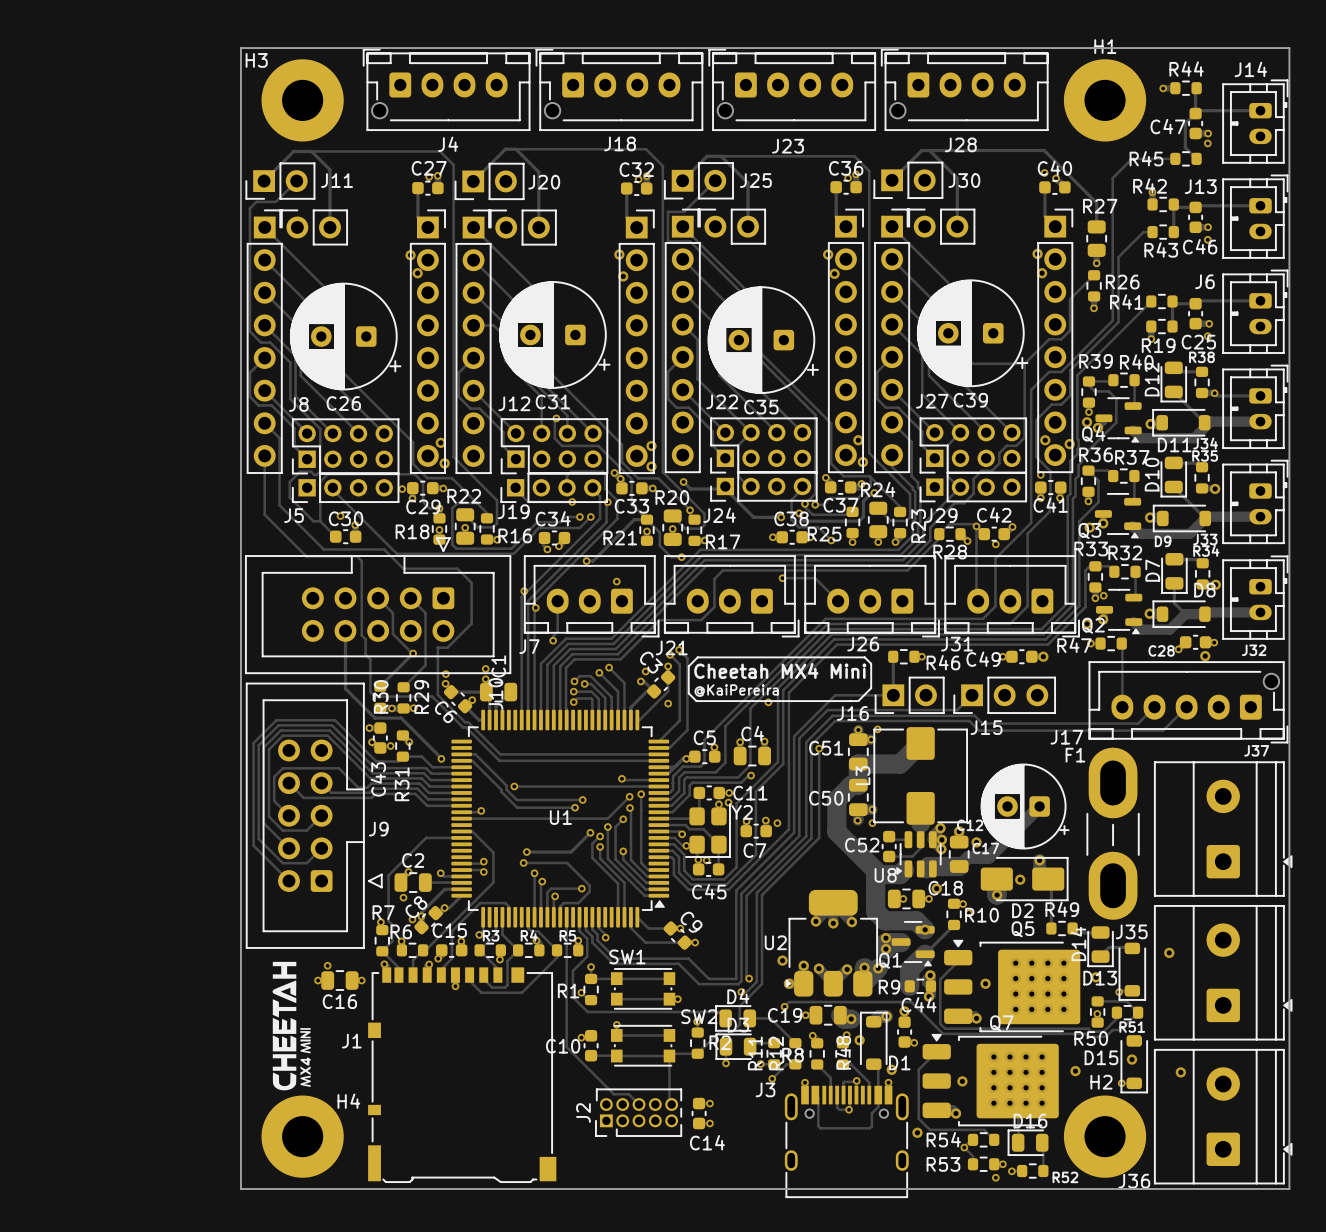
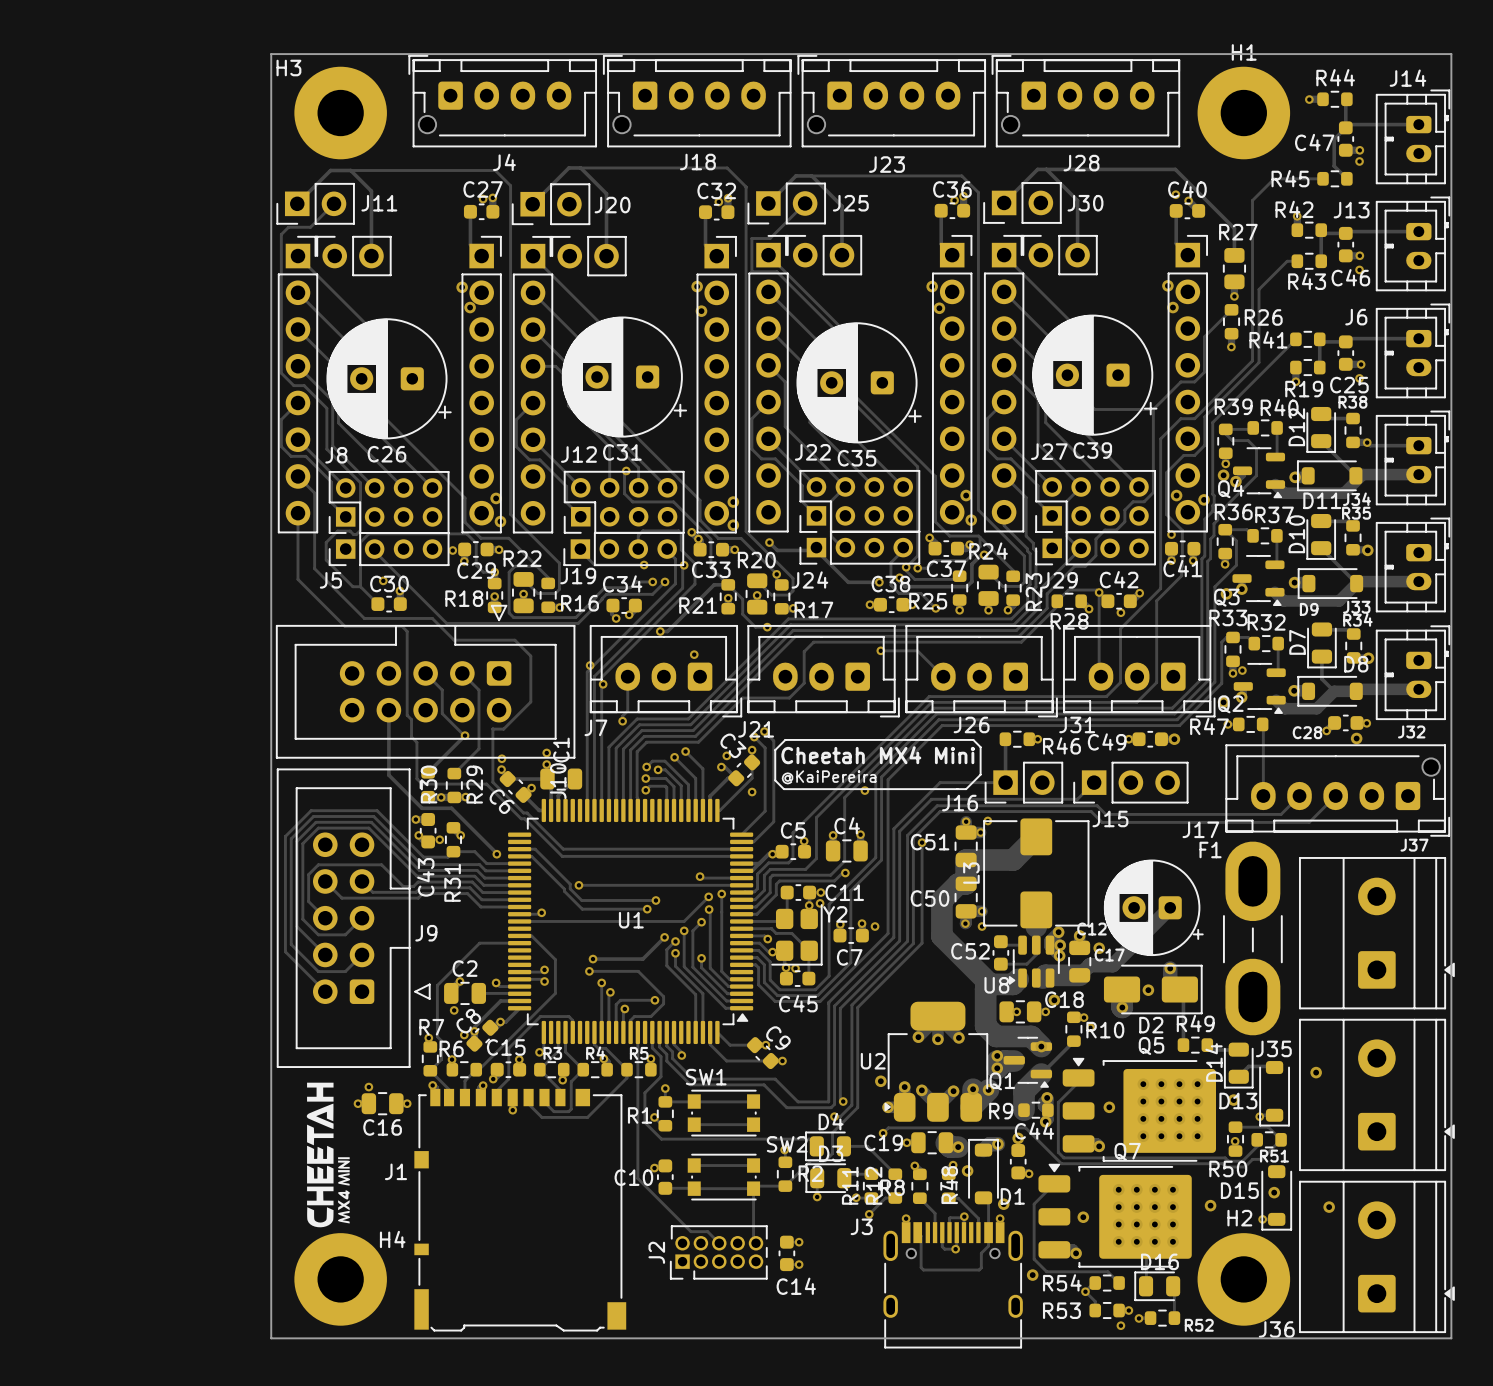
via: (677, 999) -> none
via: (616, 1024) -> none

